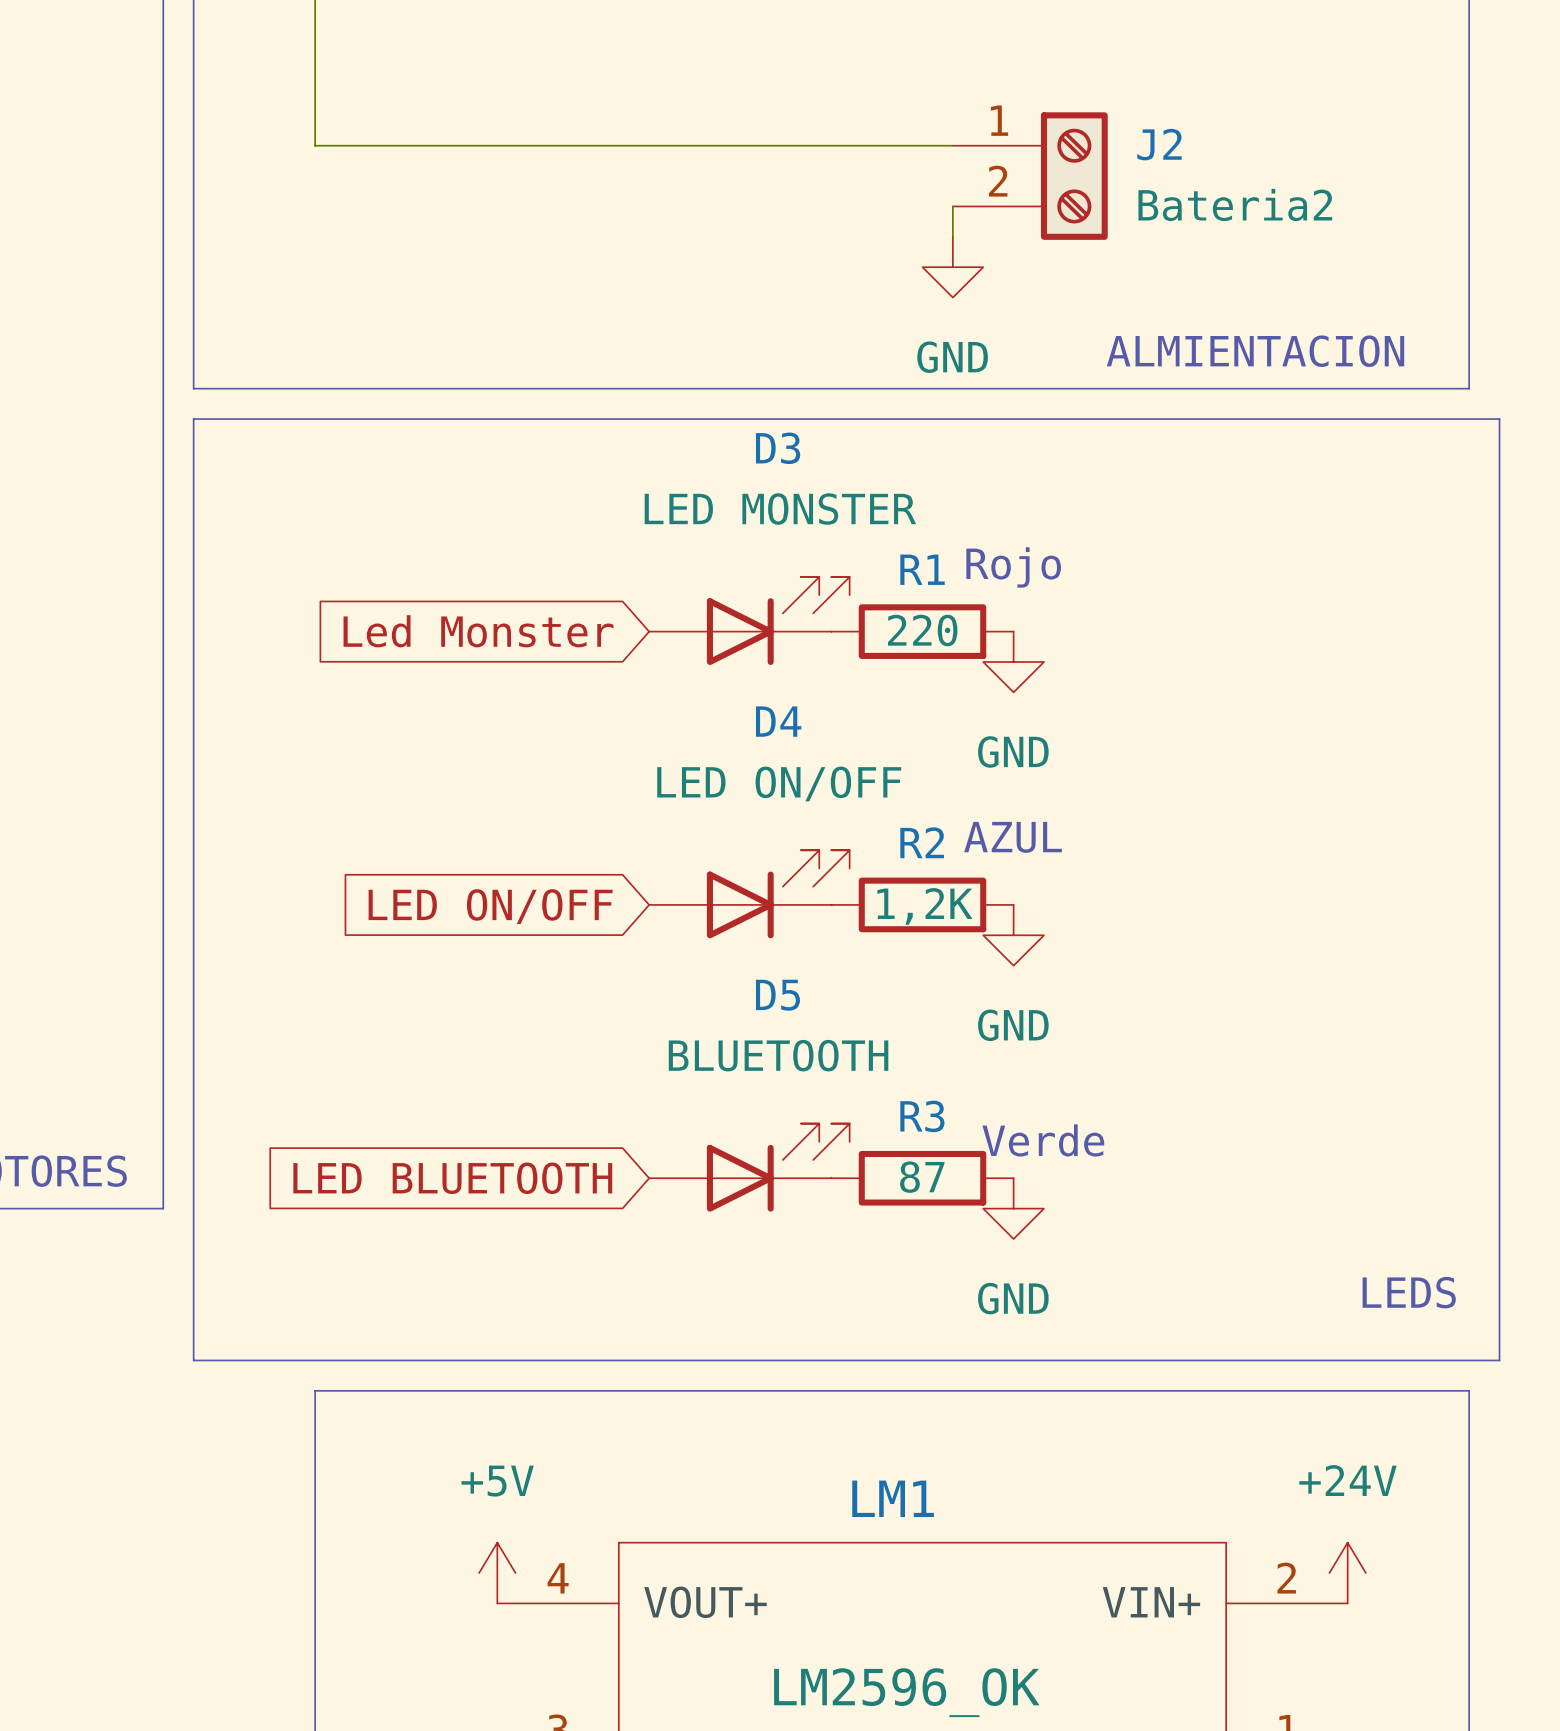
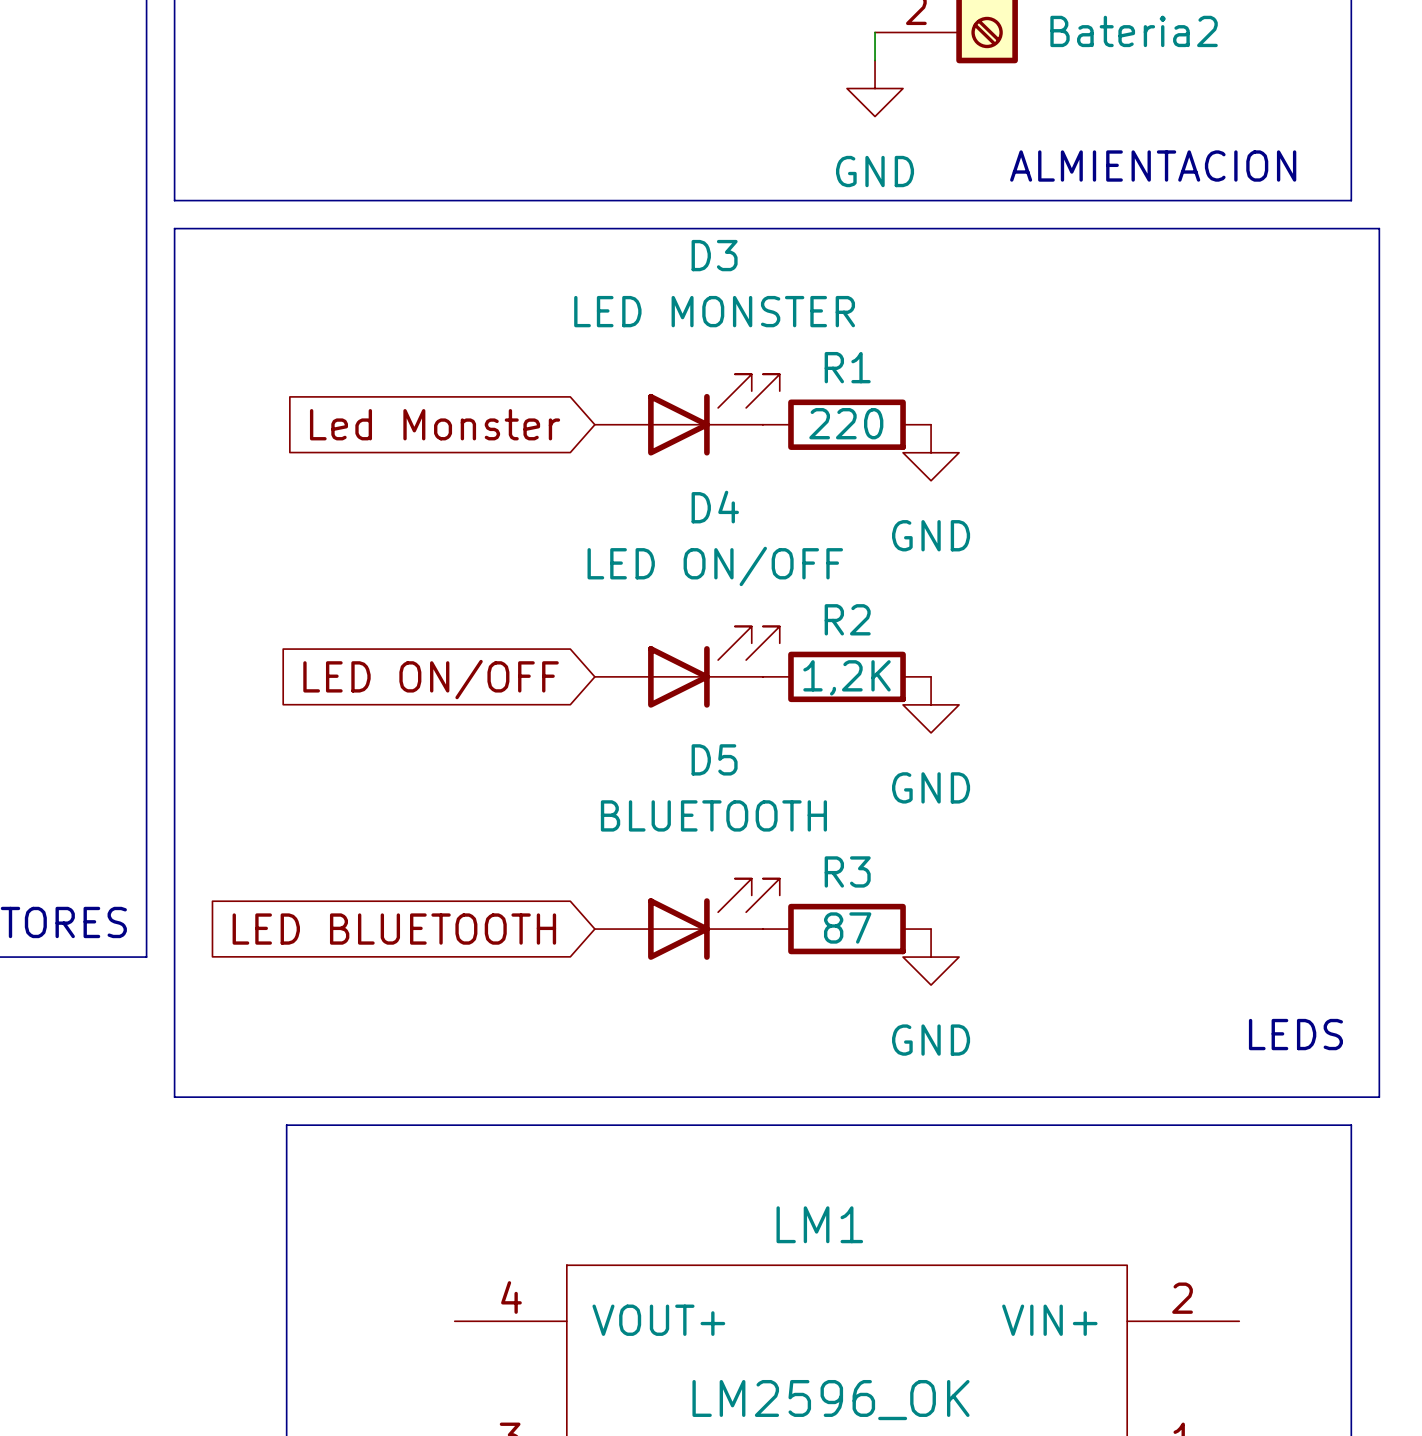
text: Rojo (1013, 567) -> none
text: AZUL (1013, 837) -> none
text: Verde (1043, 1140) -> none
power symbol: +5V (497, 1573) -> none
power symbol: +24V (1347, 1573) -> none

